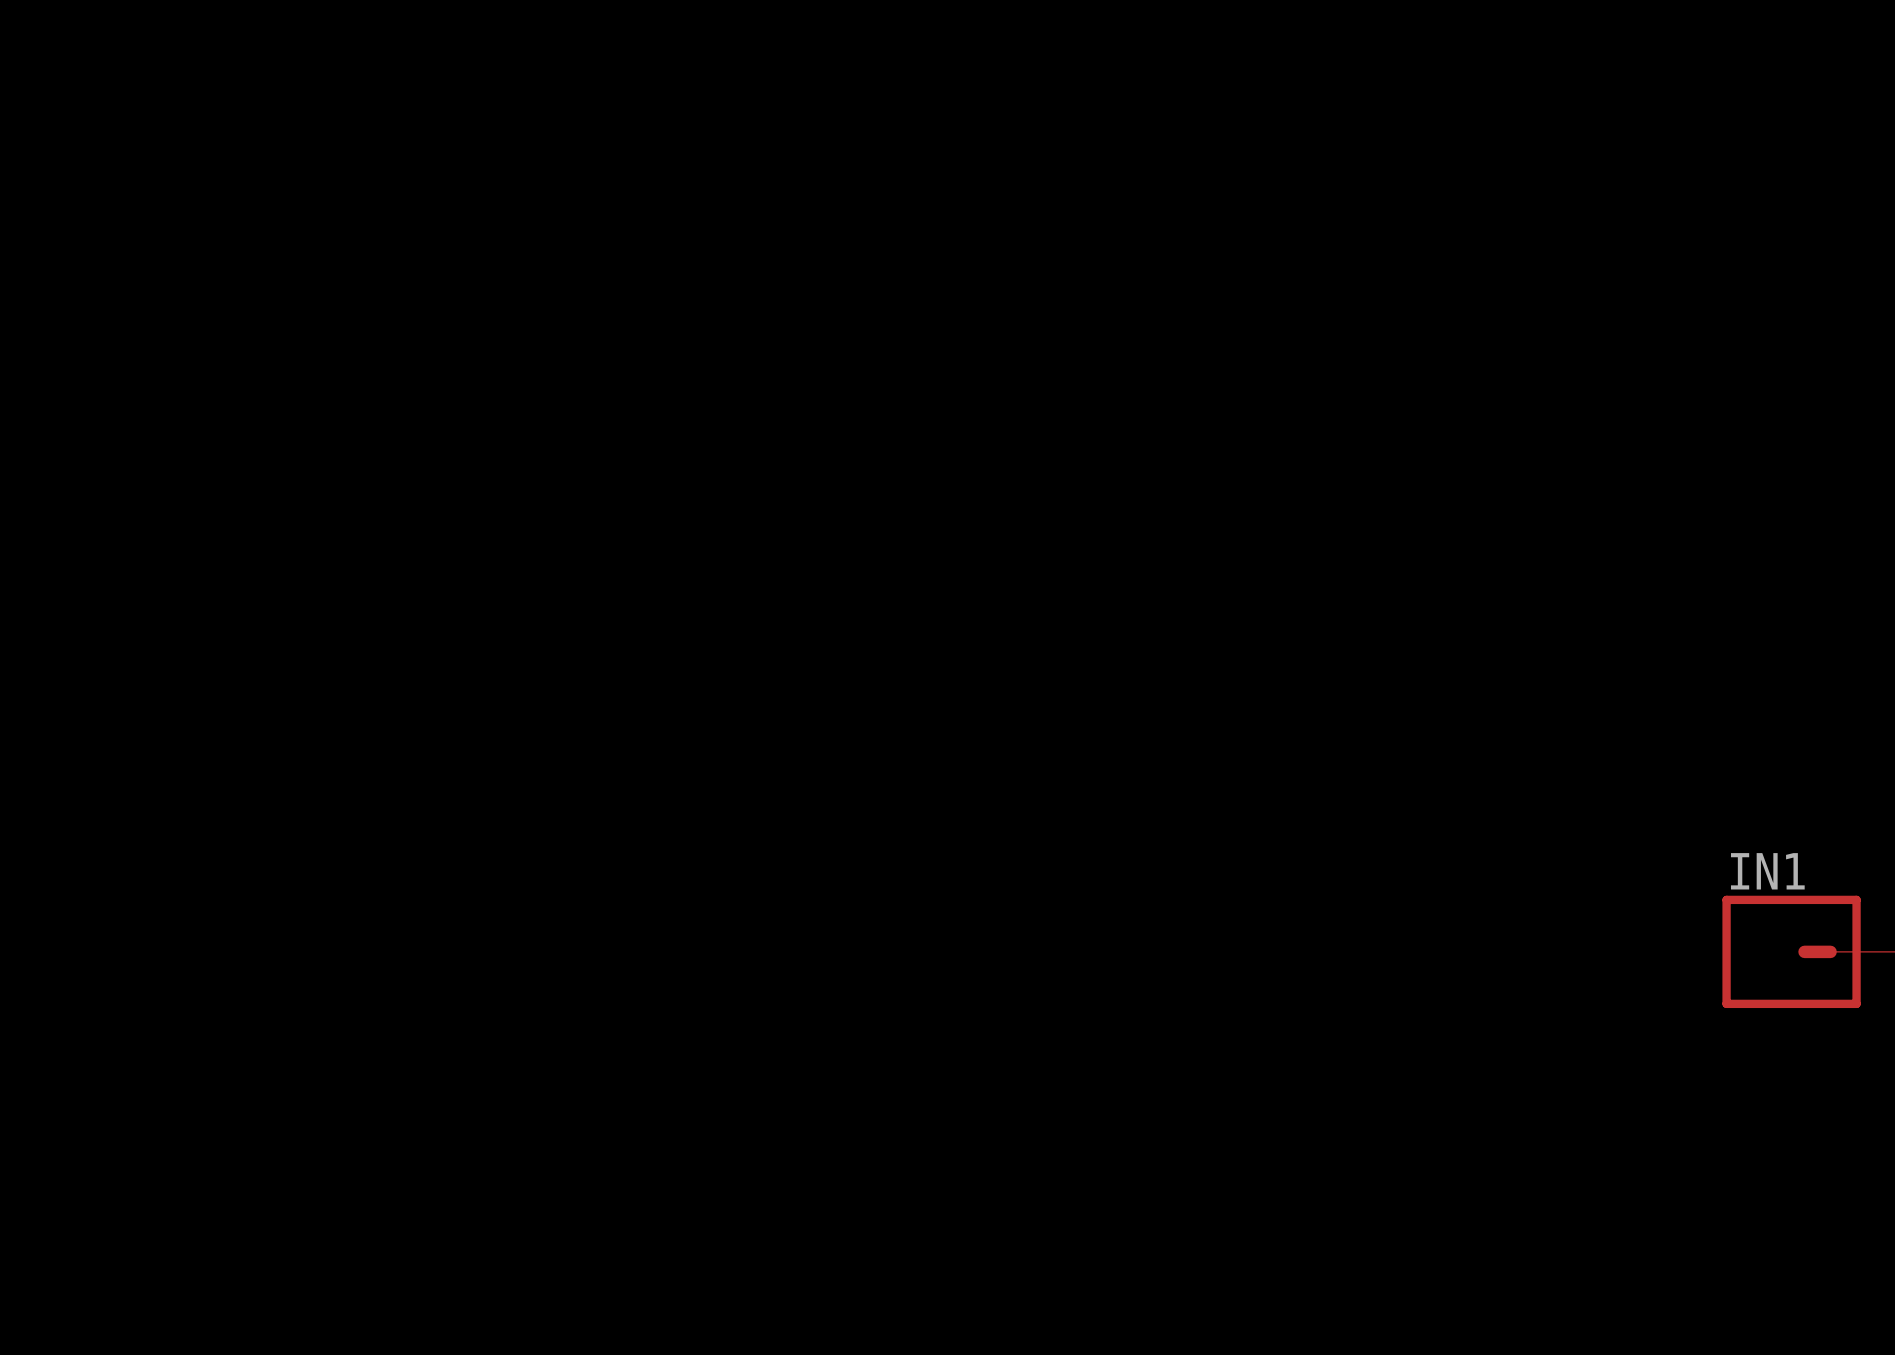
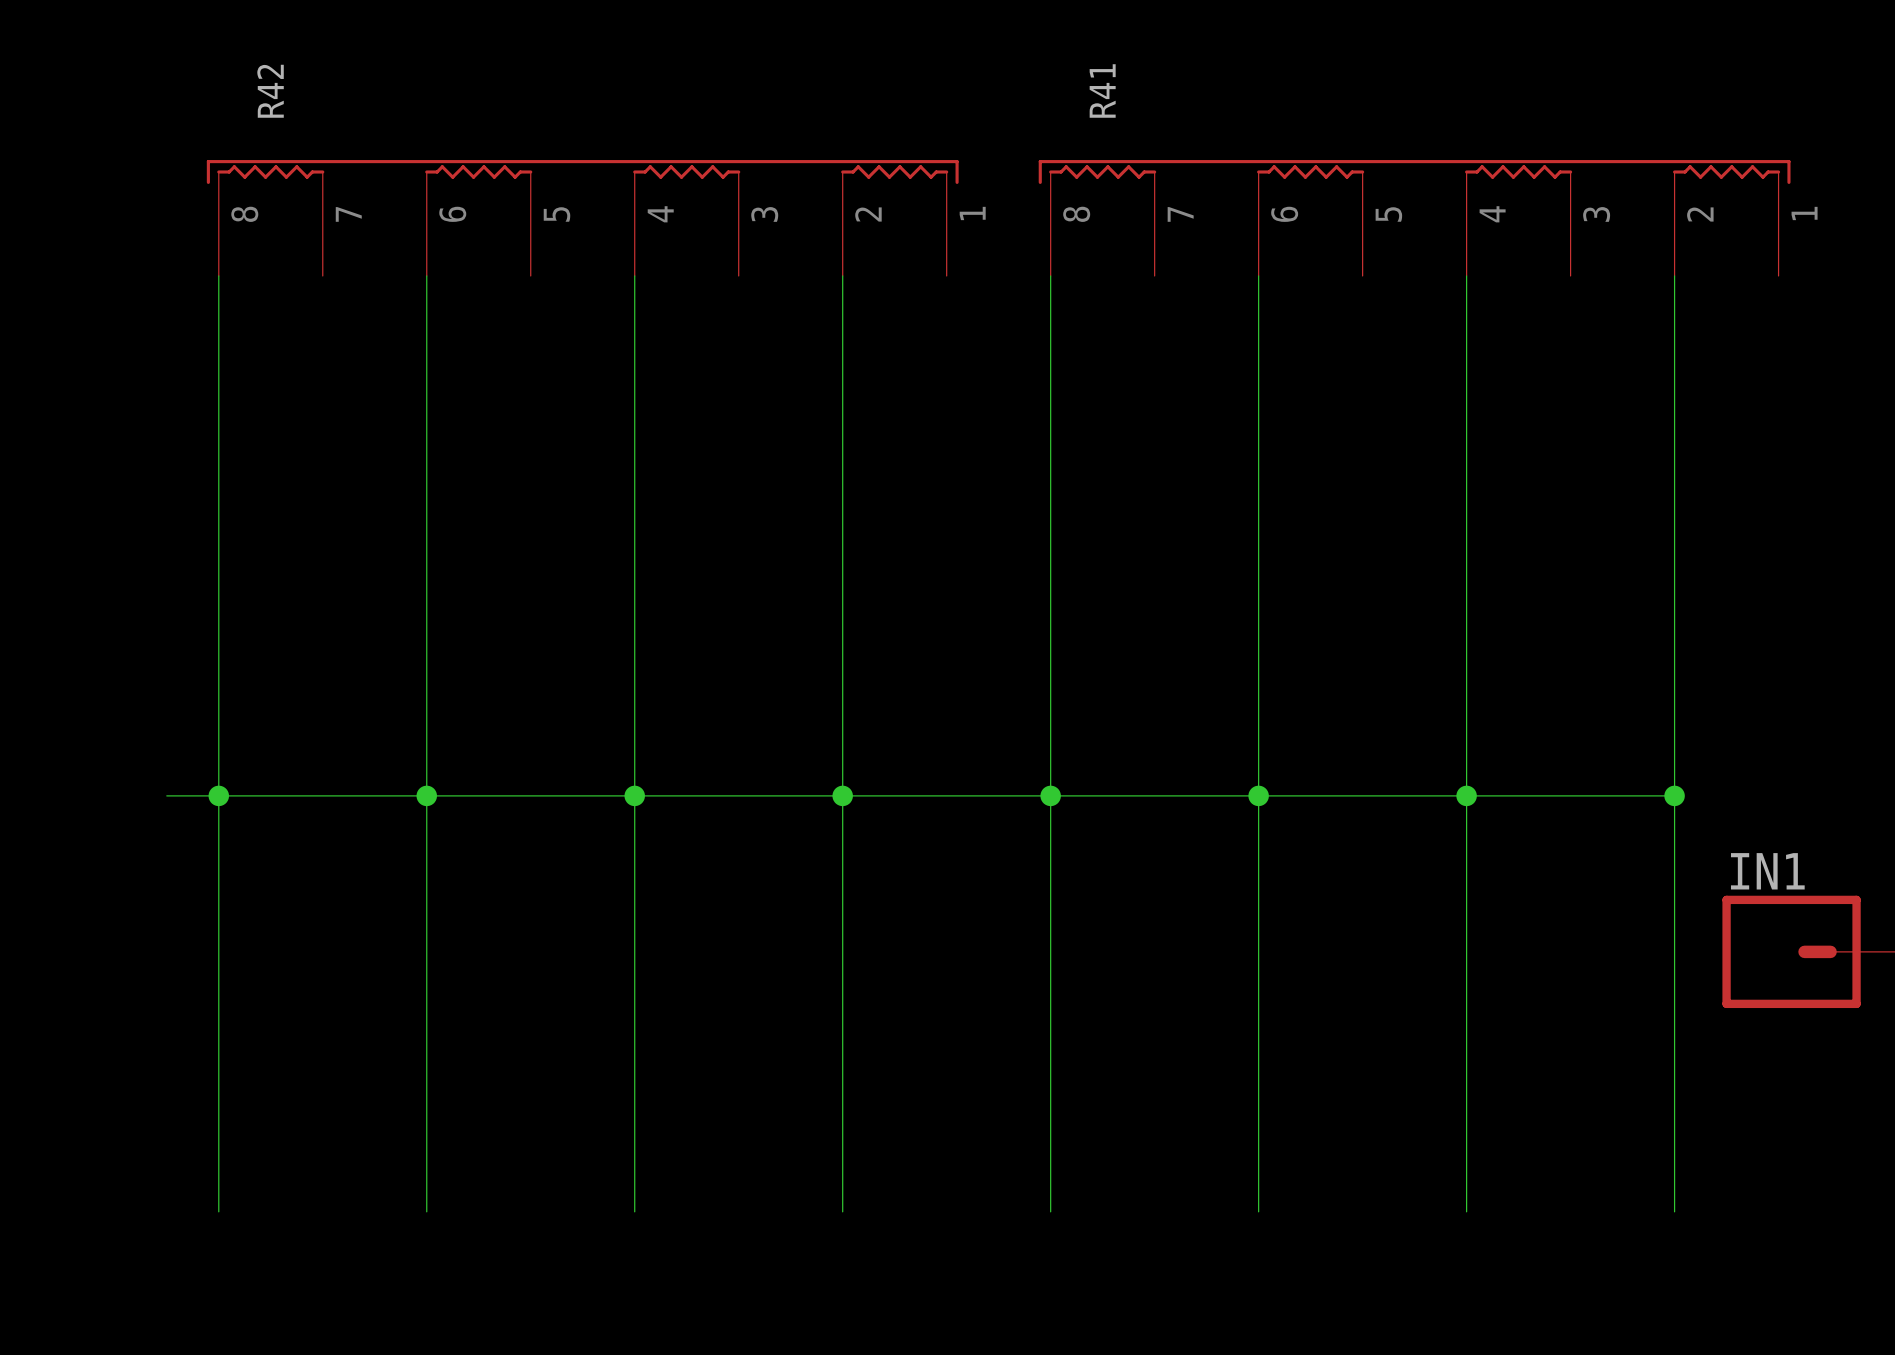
R42: none -> (582, 218)
R41: none -> (1414, 218)
wire: none -> (218, 275) (218, 1211)
wire: none -> (426, 275) (426, 1211)
wire: none -> (634, 275) (634, 1211)
wire: none -> (842, 275) (842, 1211)
wire: none -> (1050, 275) (1050, 1211)
wire: none -> (1258, 275) (1258, 1211)
wire: none -> (1466, 275) (1466, 1211)
wire: none -> (1674, 275) (1674, 1211)
wire: none -> (166, 795) (1674, 795)
junction: none -> (218, 795)
junction: none -> (426, 795)
junction: none -> (634, 795)
junction: none -> (842, 795)
junction: none -> (1050, 795)
junction: none -> (1258, 795)
junction: none -> (1466, 795)
junction: none -> (1674, 795)

